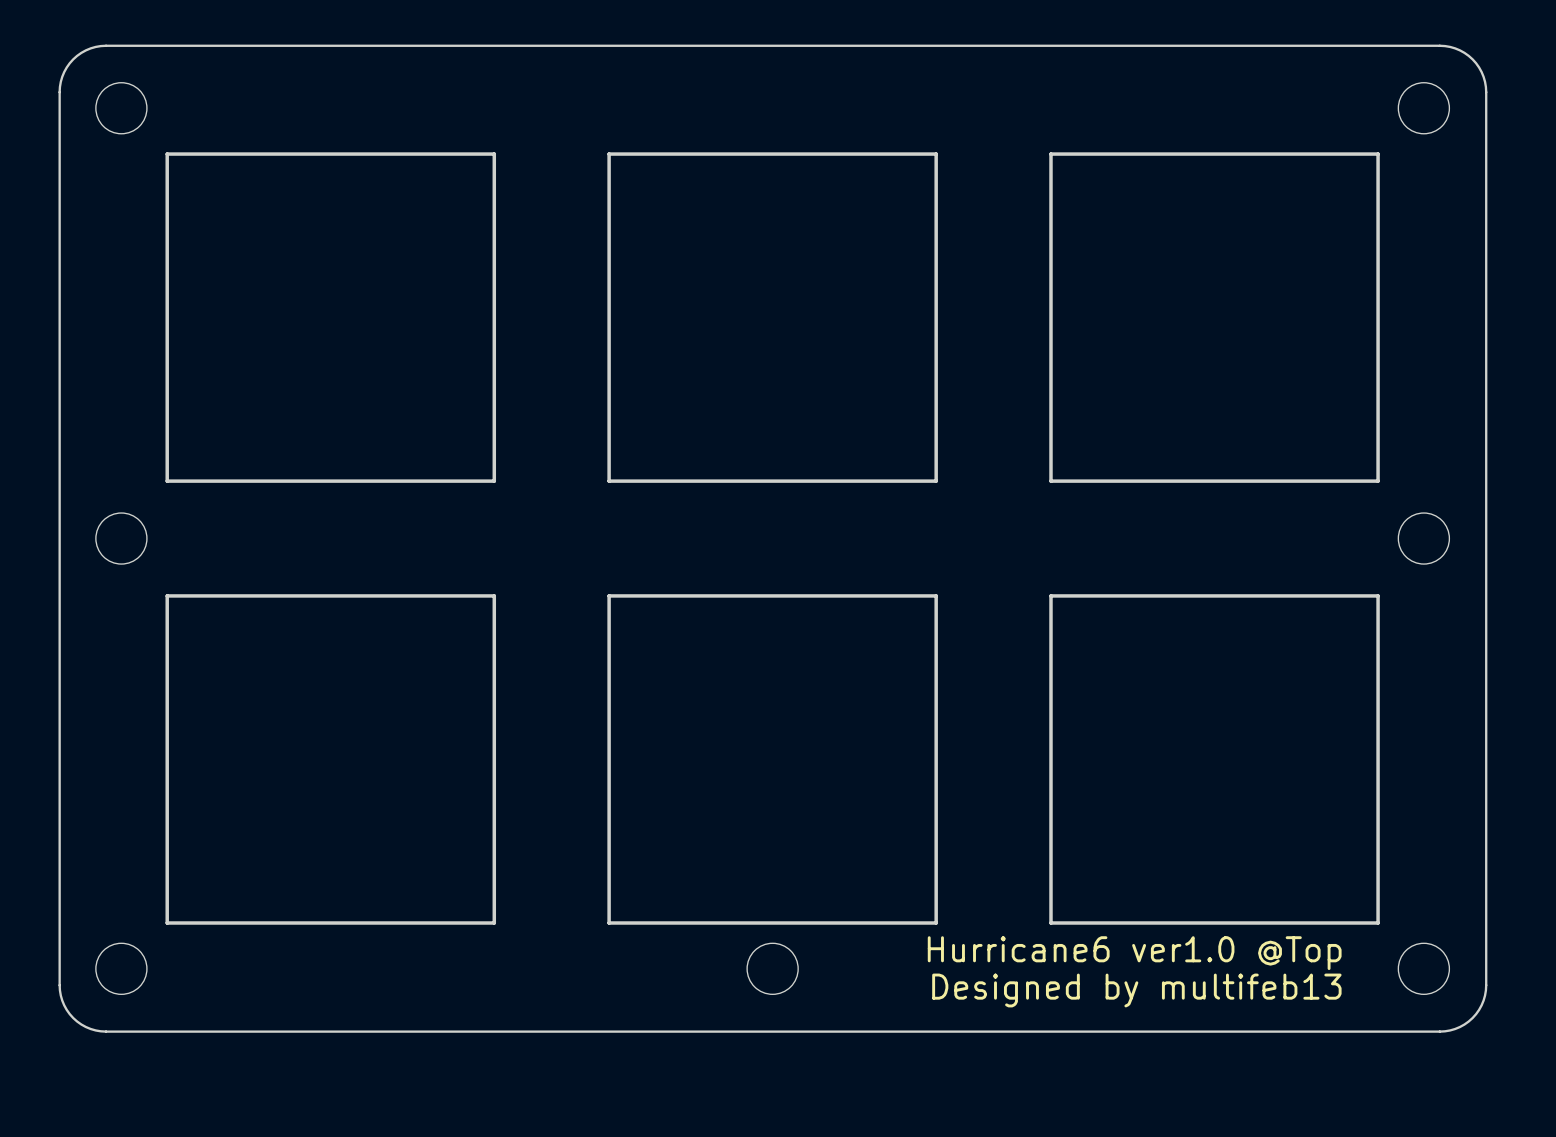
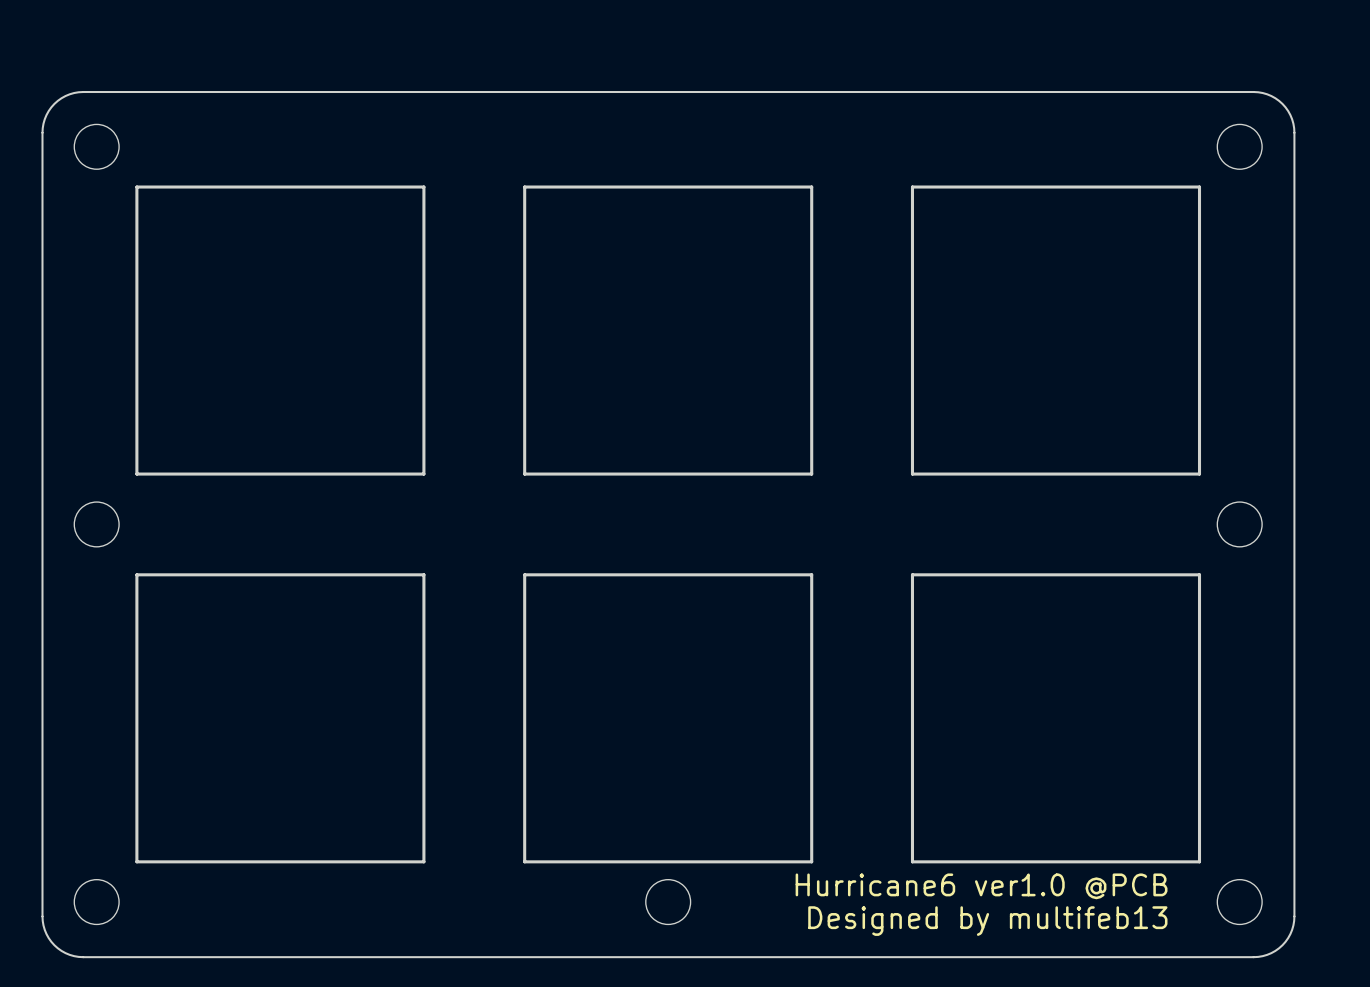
text: Hurricane6 ver1.0 @Top (1134, 953) -> Hurricane6 ver1.0 @PCB (981, 886)

